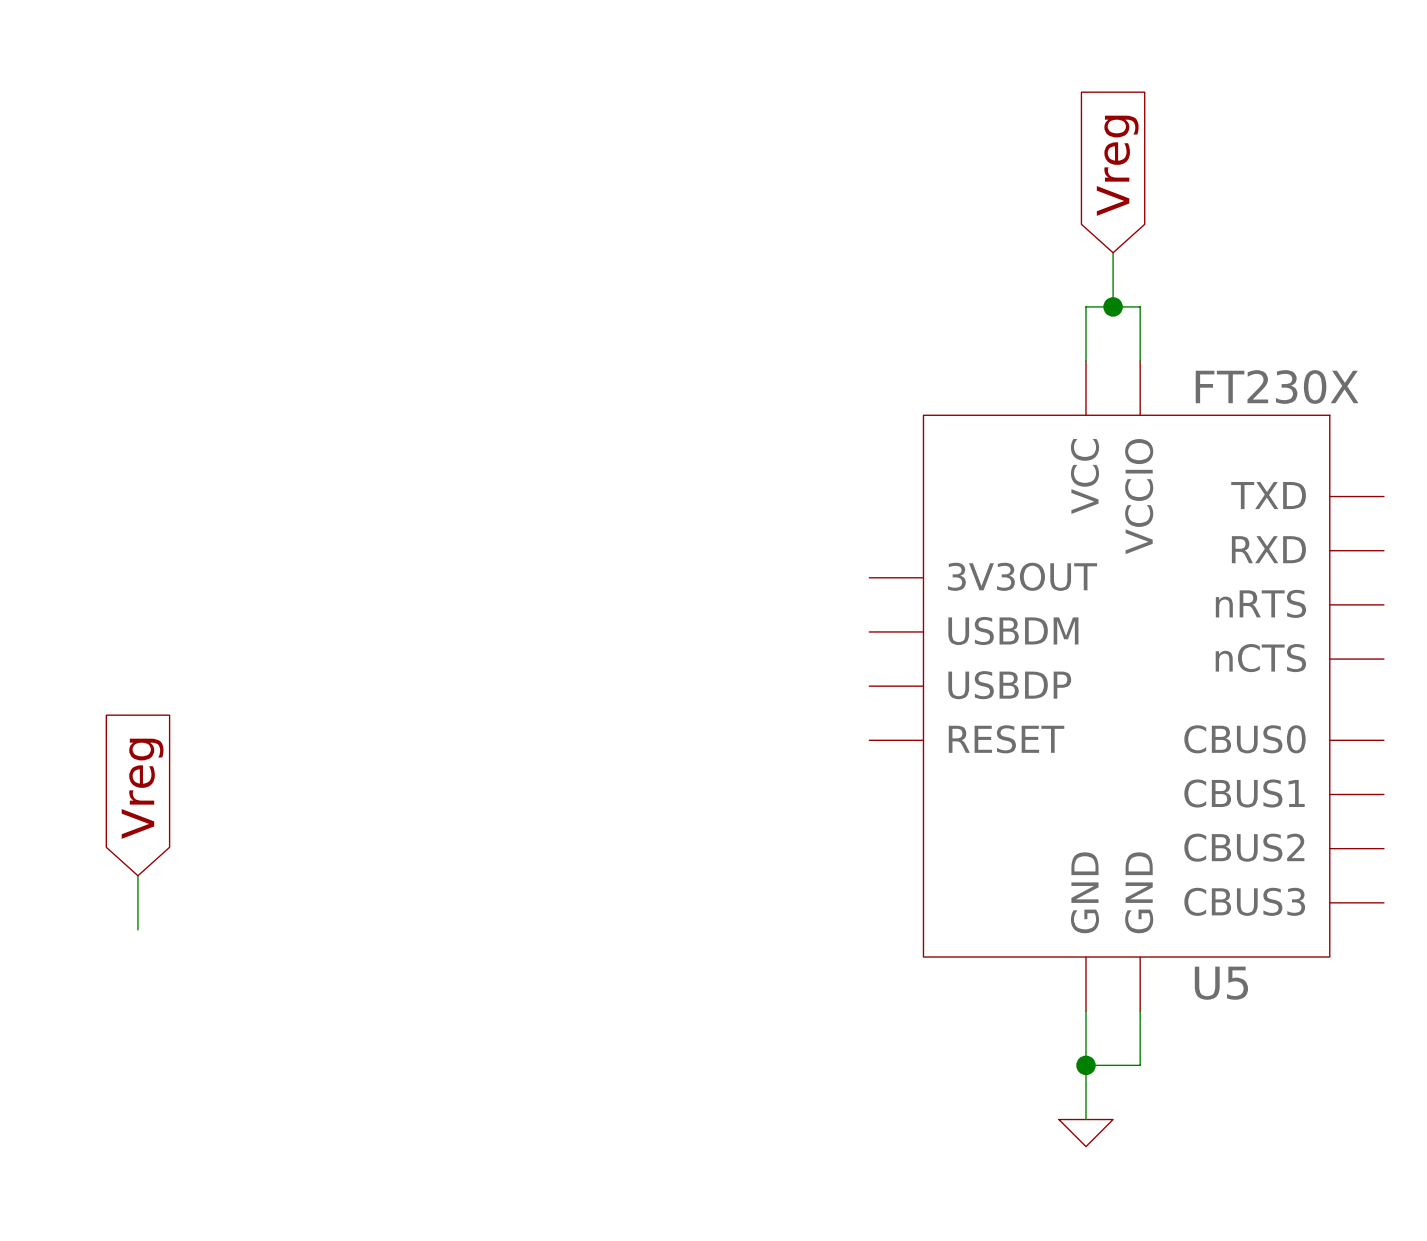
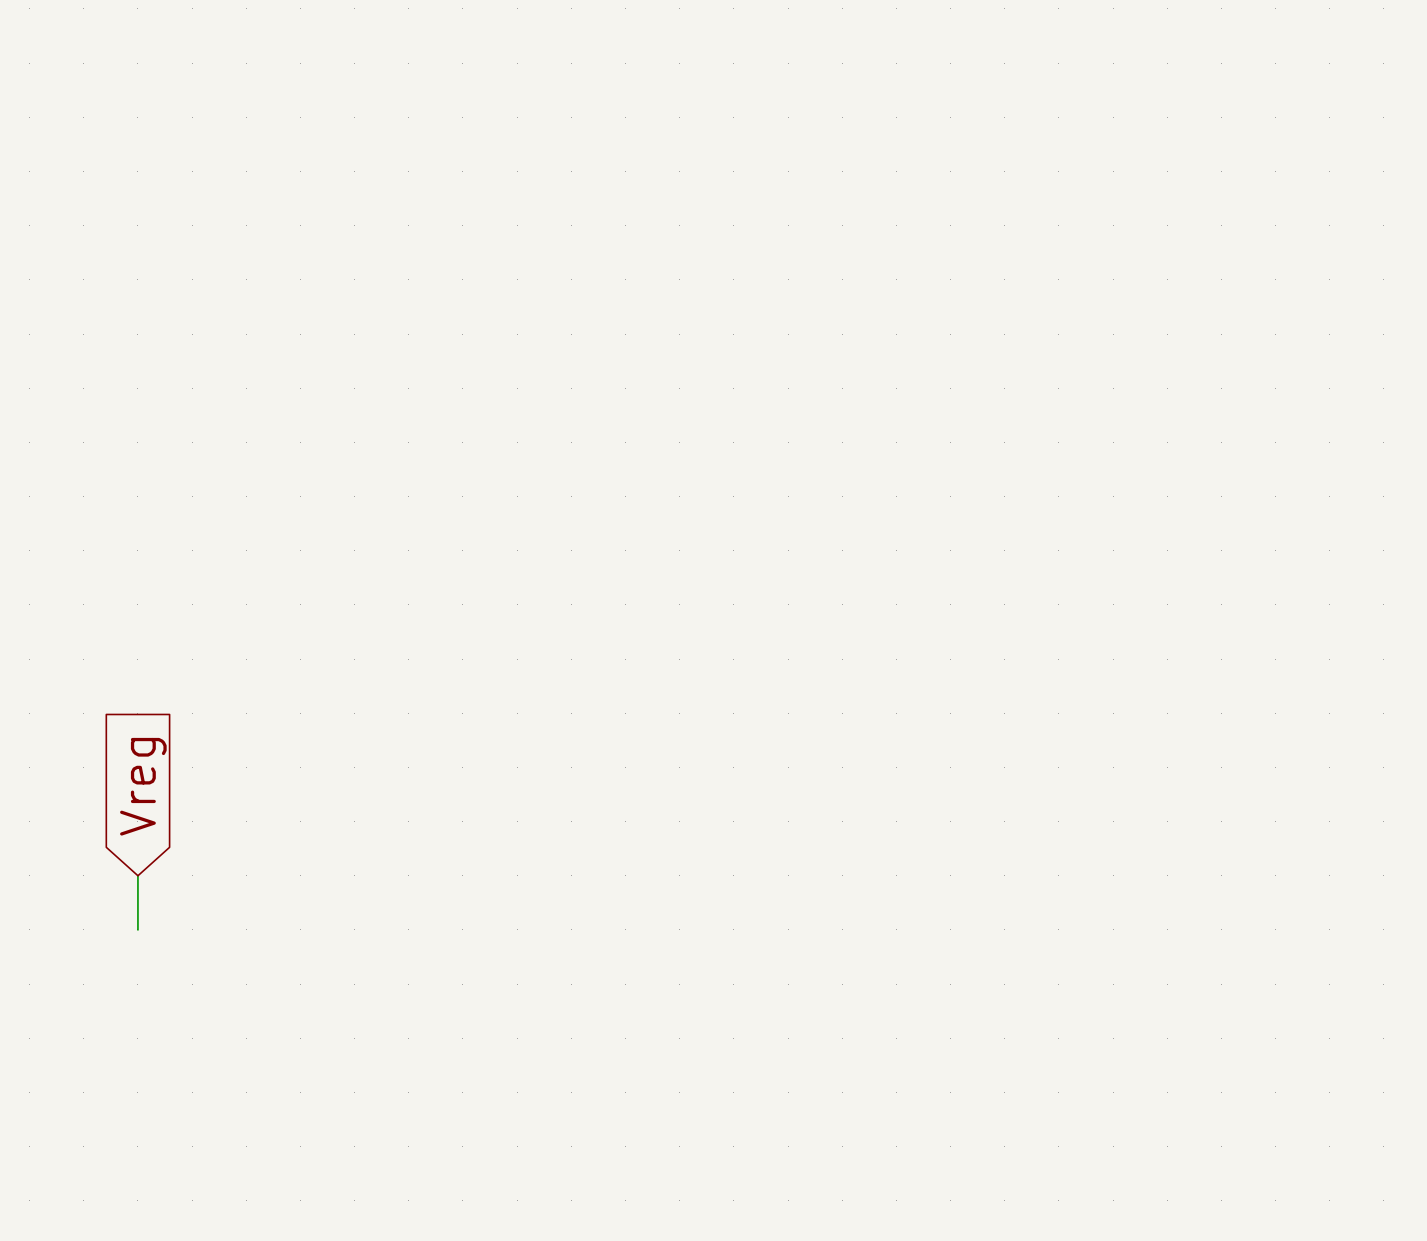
global label: Vreg (1117, 165) -> none
wire: (1113, 252) (1113, 306) -> none
junction: (1113, 306) -> none
wire: (1085, 361) (1085, 306) (1140, 306) (1140, 361) -> none
U5: FT230X (1126, 686) -> none
wire: (1085, 1011) (1085, 1119) -> none
wire: (1140, 1011) (1140, 1065) (1085, 1065) -> none
junction: (1085, 1065) -> none
power symbol: (1085, 1133) -> none

